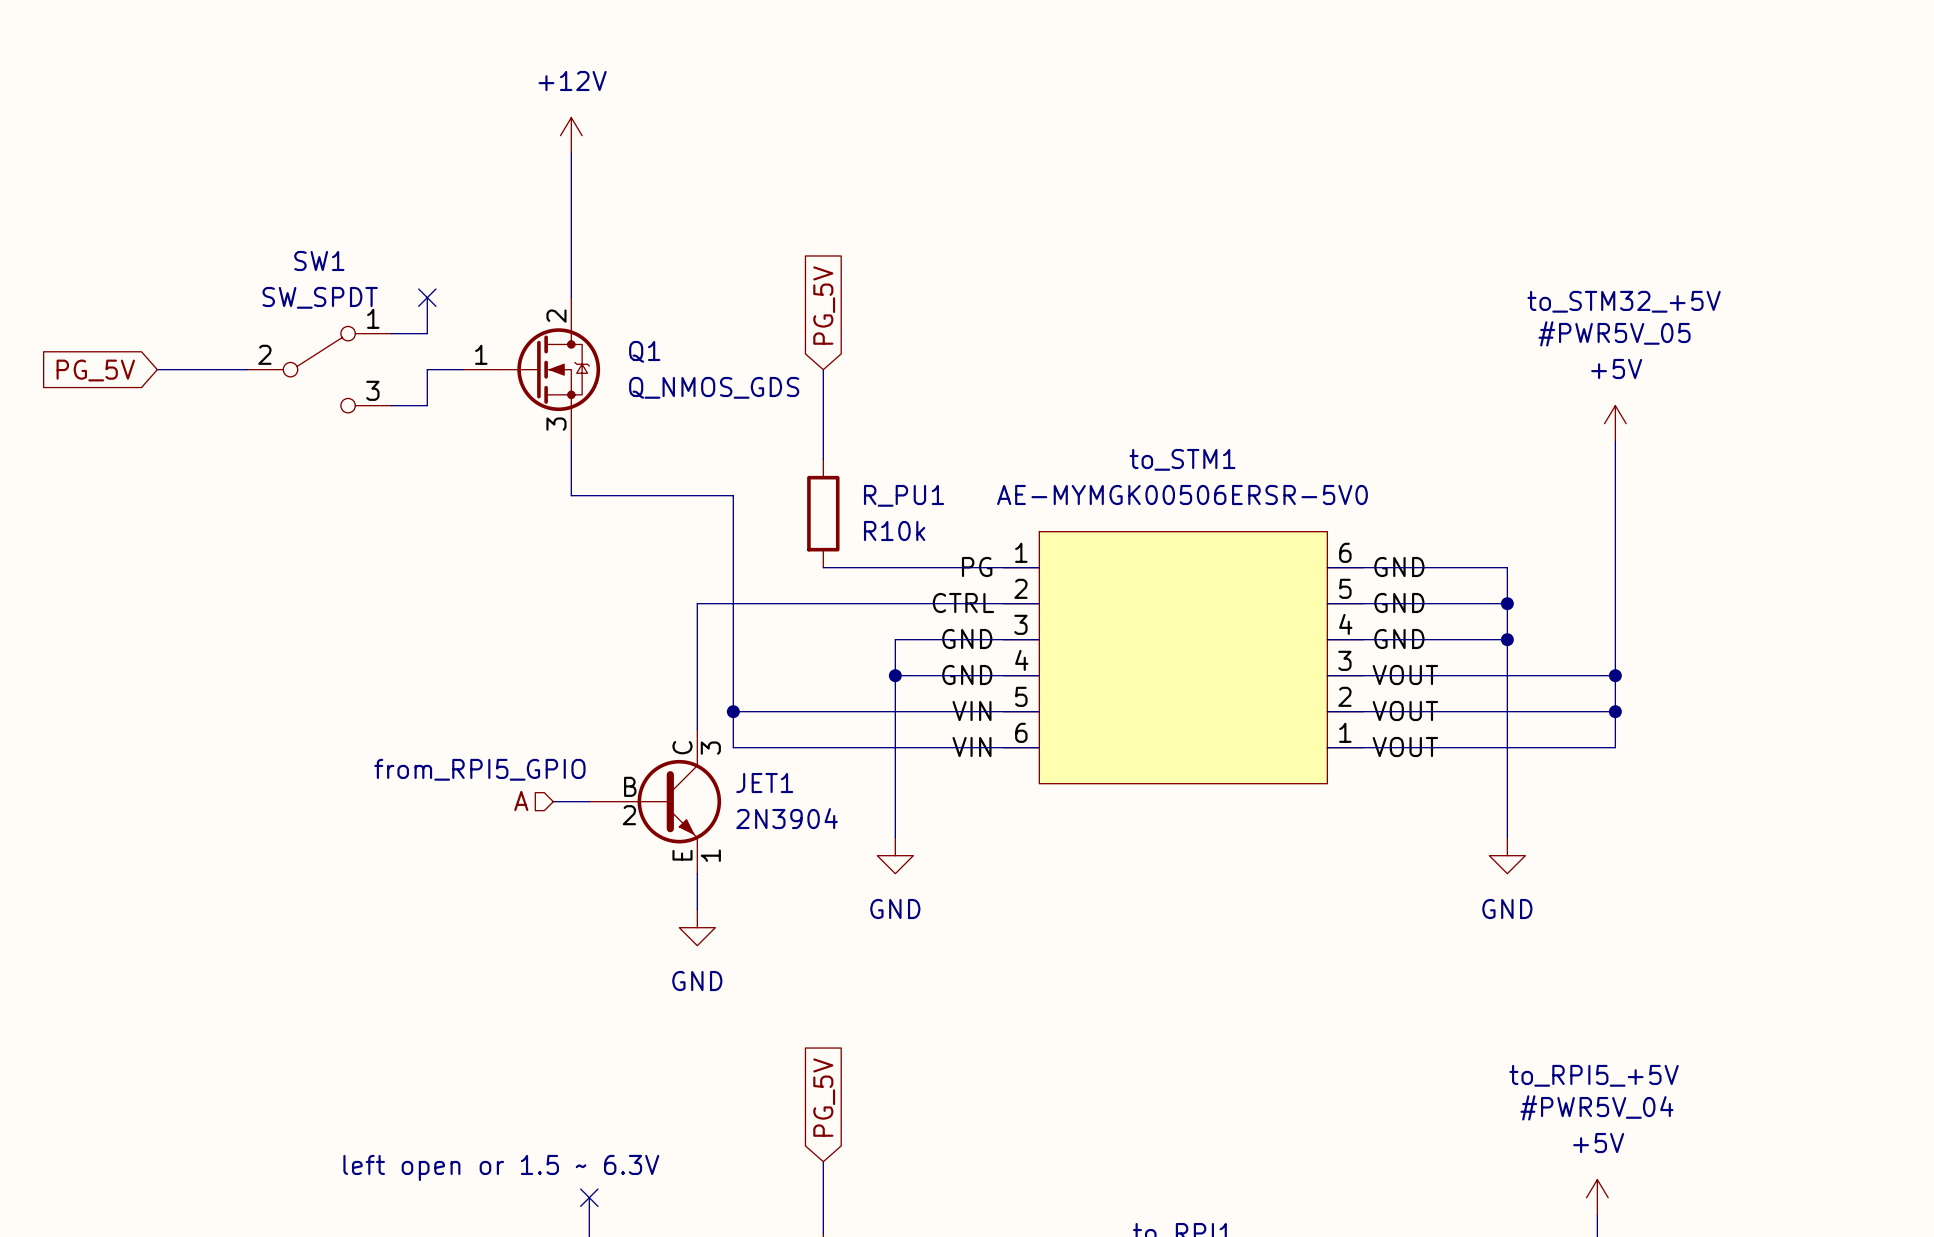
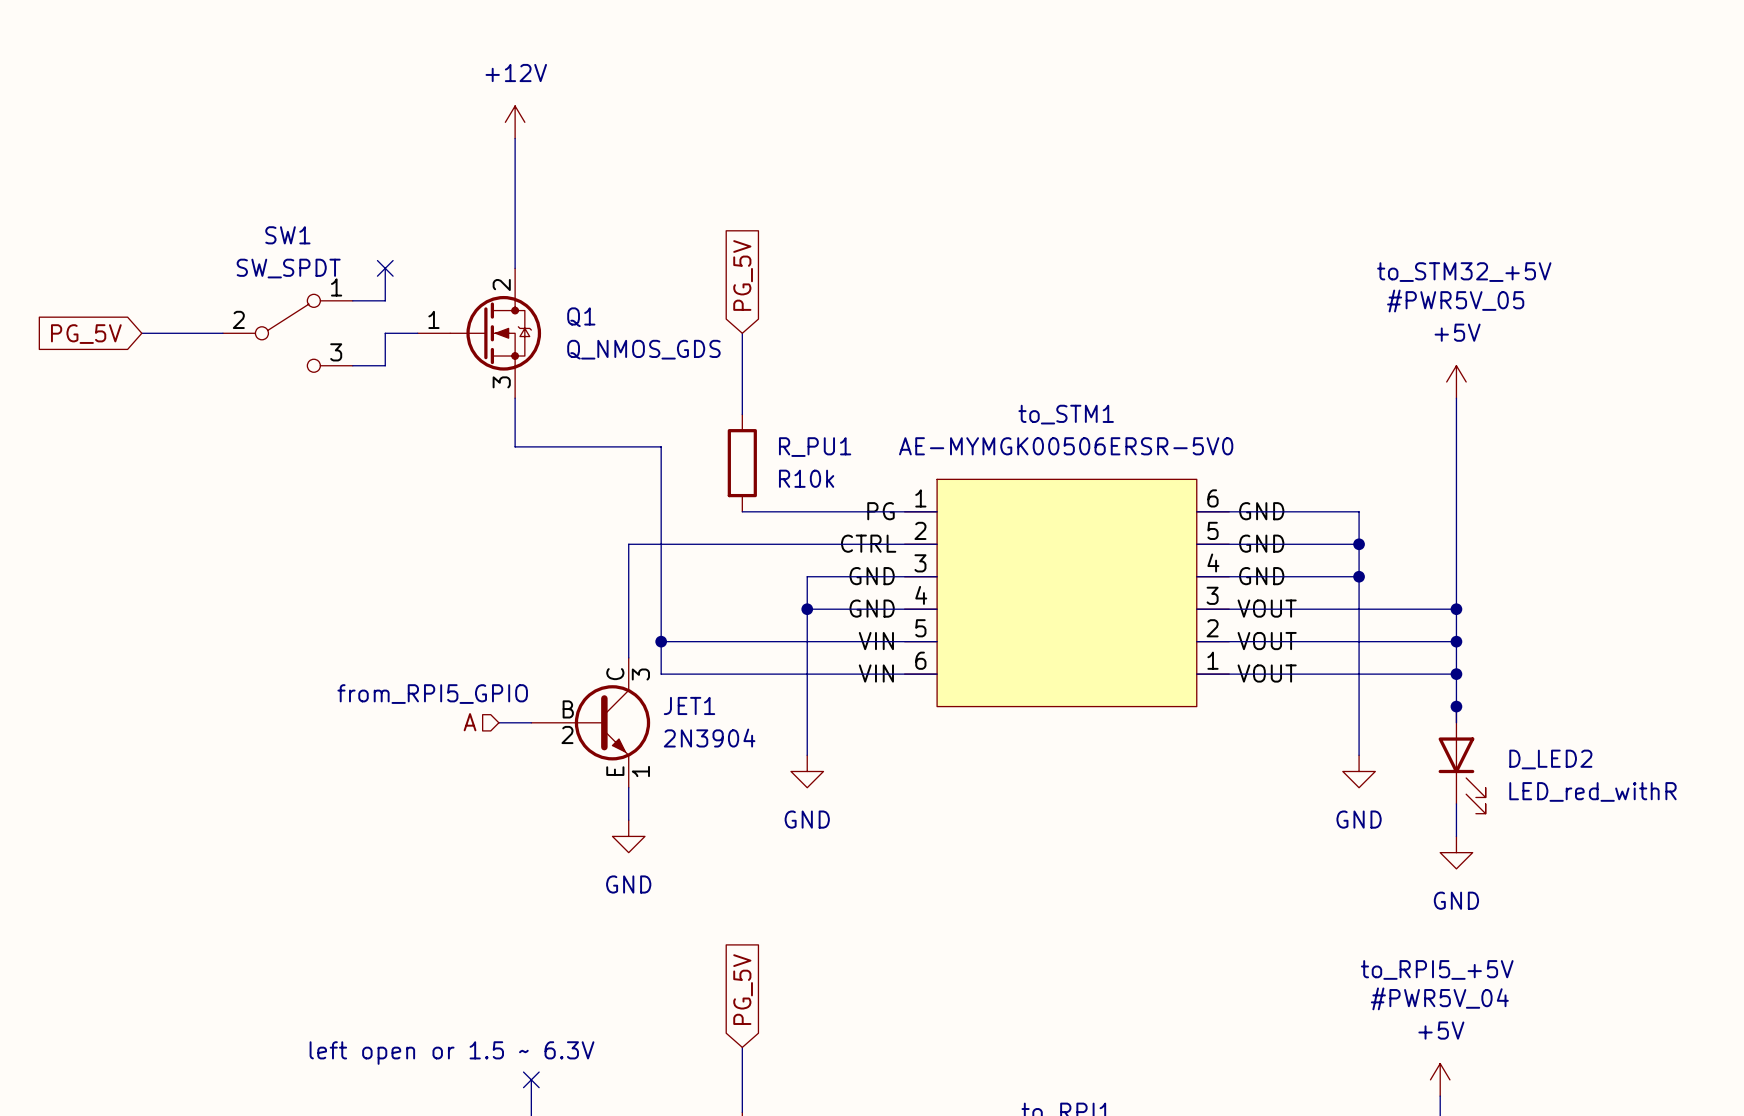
wire: none -> (1456, 674) (1456, 722)
junction: none -> (1456, 674)
junction: none -> (1456, 706)
D_LED2: none -> LED_red_withR (1462, 760)
wire: none -> (1456, 803) (1456, 836)
power symbol: none -> GND (1456, 852)

